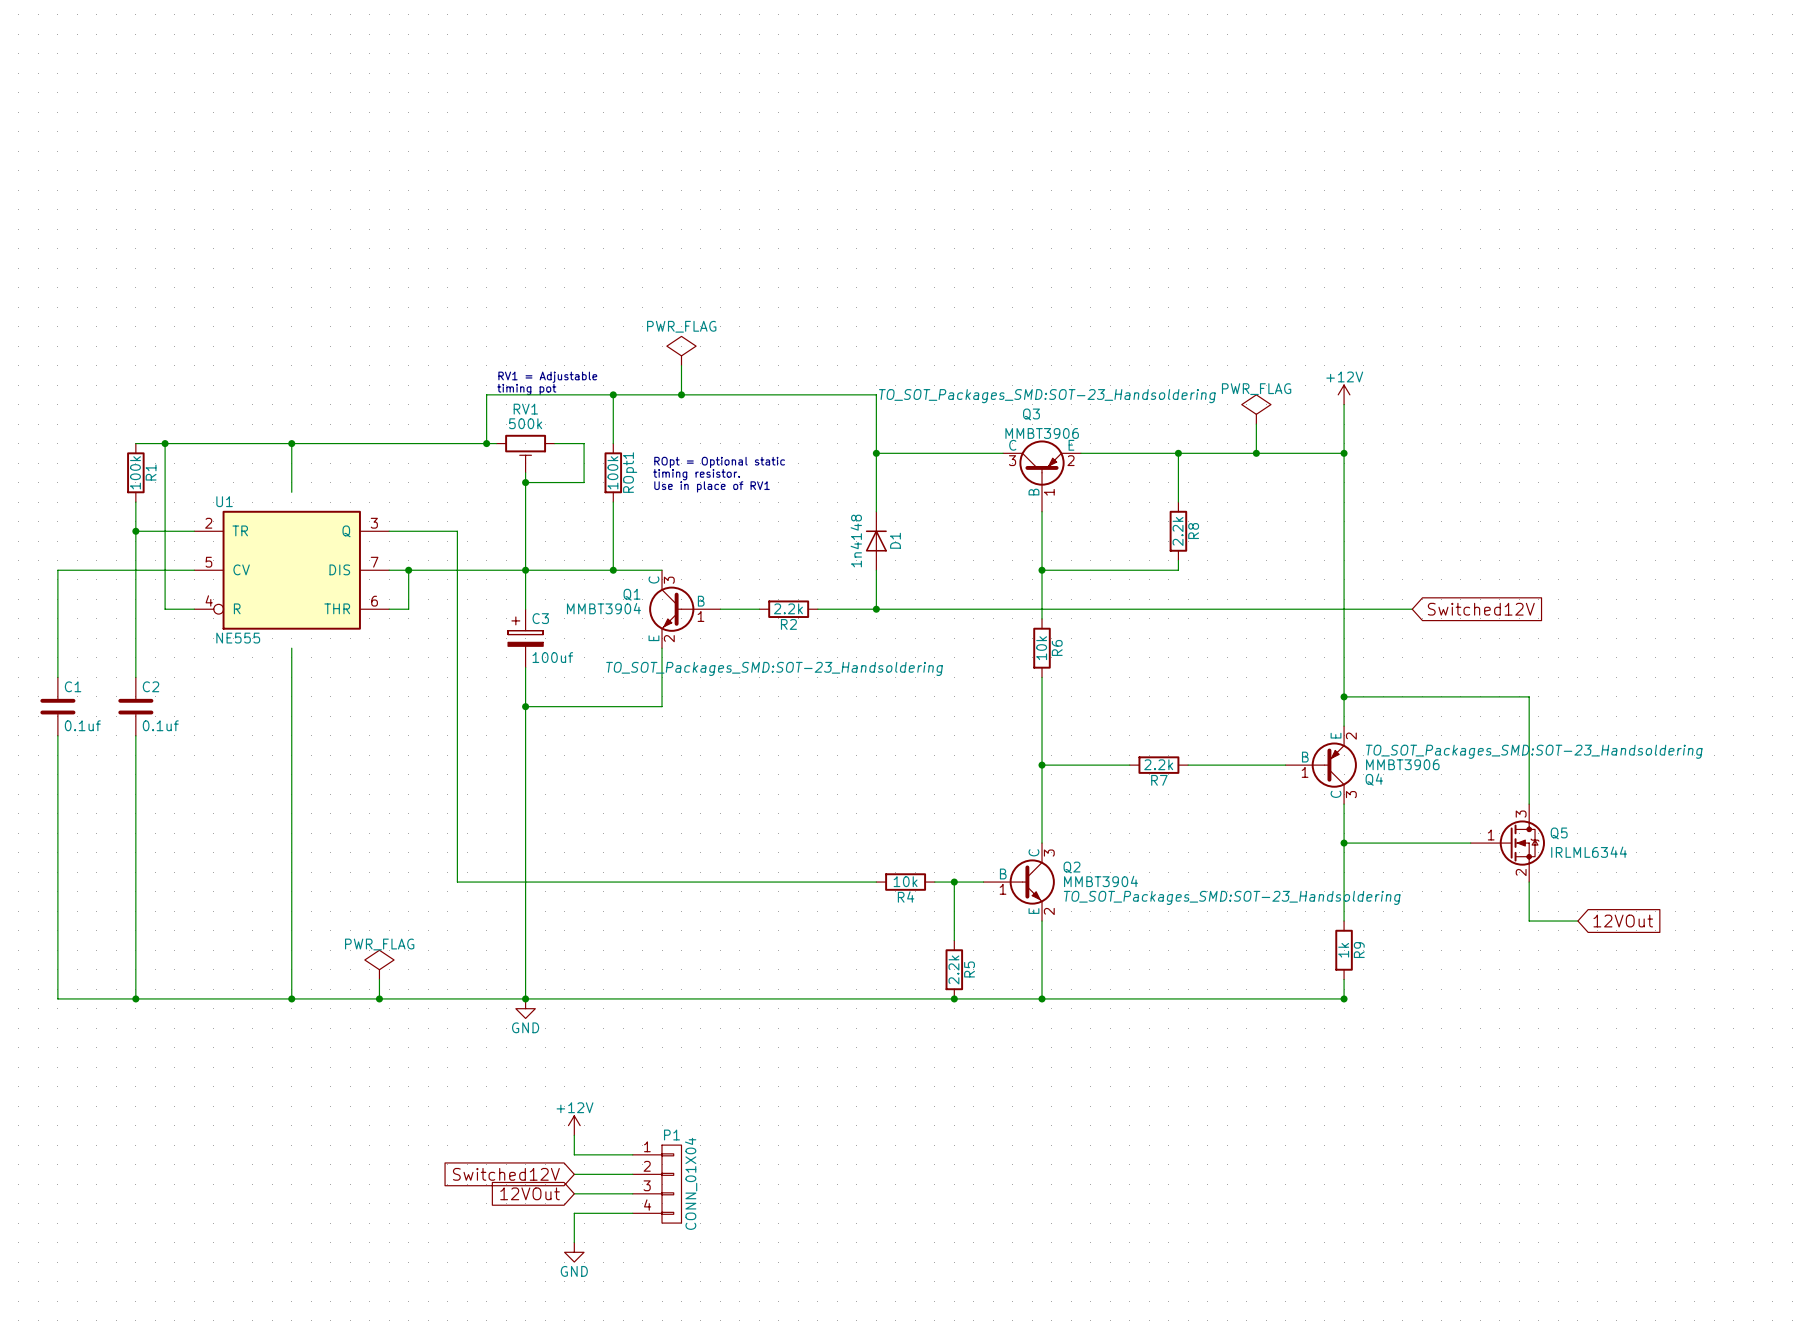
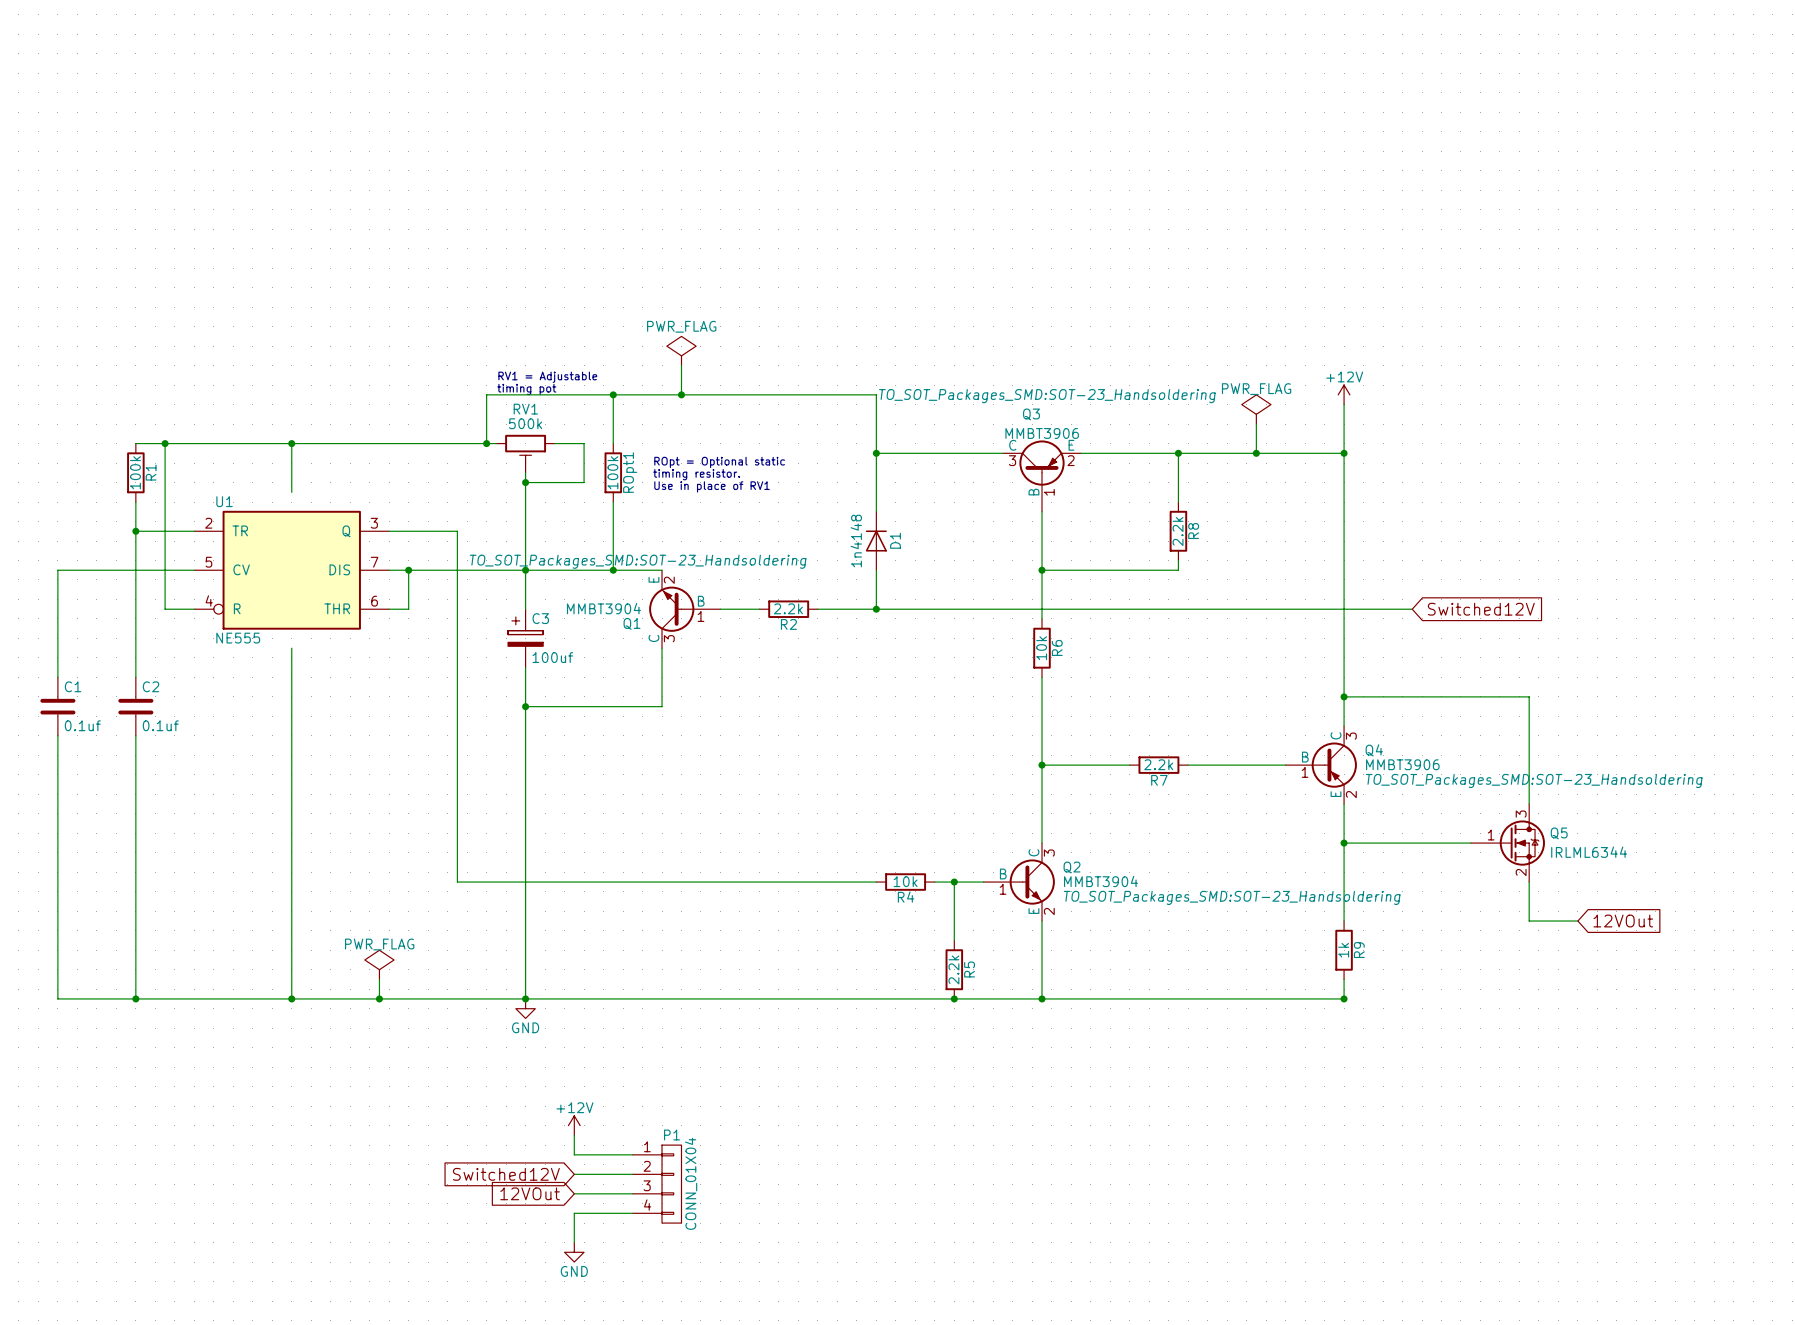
Q1 flip: as is (671, 609) -> up-down (671, 609)
Q1 text position: TO_SOT_Packages_SMD:SOT-23_Handsoldering (774, 668) -> TO_SOT_Packages_SMD:SOT-23_Handsoldering (638, 561)
Q4 flip: as is (1334, 765) -> up-down (1334, 765)

